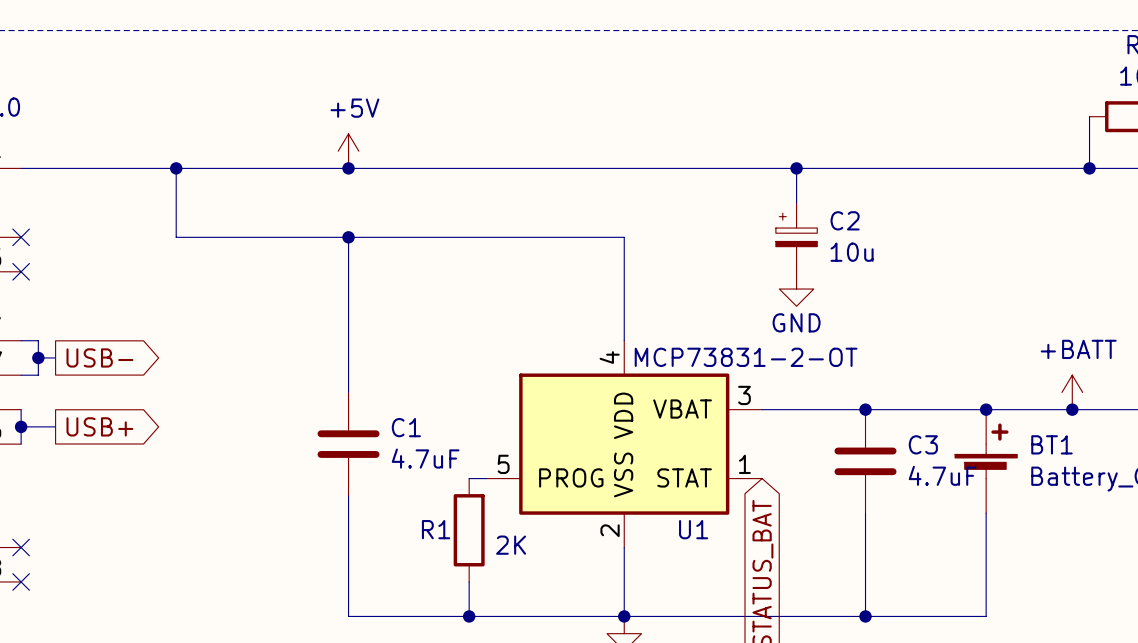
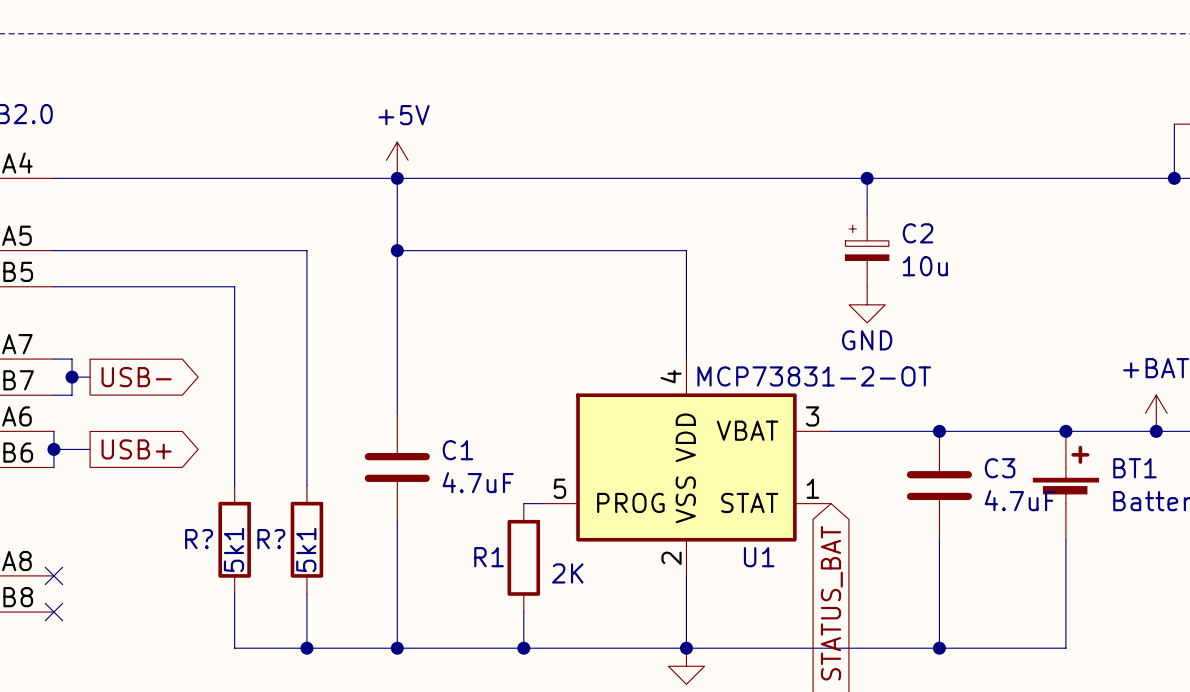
wire: (176, 168) (176, 237) -> (53, 250) (216, 250)
junction: (176, 168) -> none
no-connect mark: (21, 237) -> none
wire: (262, 237) (348, 237) -> (397, 178) (397, 250)
wire: none -> (306, 250) (306, 485)
wire: none -> (53, 286) (234, 286) (234, 485)
no-connect mark: (21, 271) -> none
R?: none -> 5k1 (234, 539)
R?: none -> 5k1 (306, 539)
wire: none -> (234, 593) (234, 648) (397, 648)
wire: none -> (306, 593) (306, 648)
junction: none -> (306, 648)
junction: none -> (397, 648)

